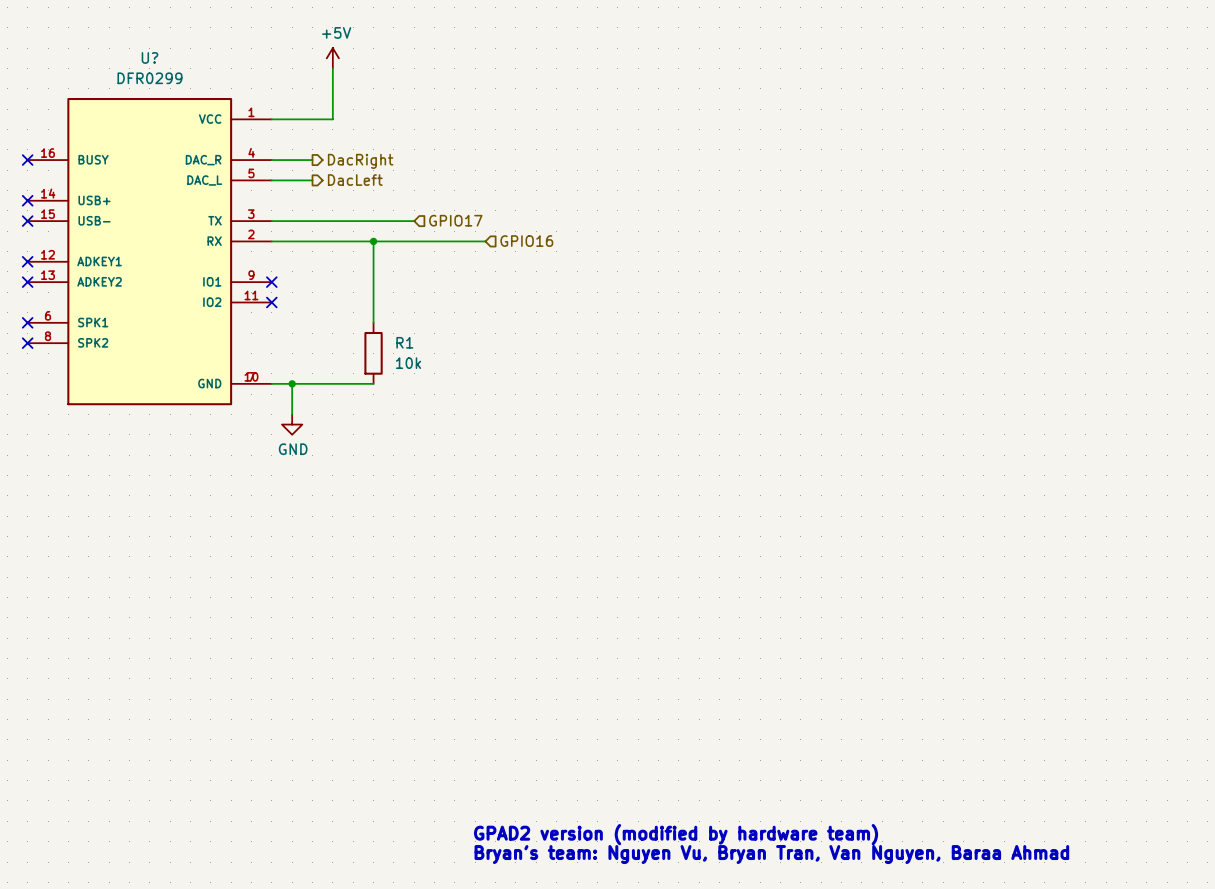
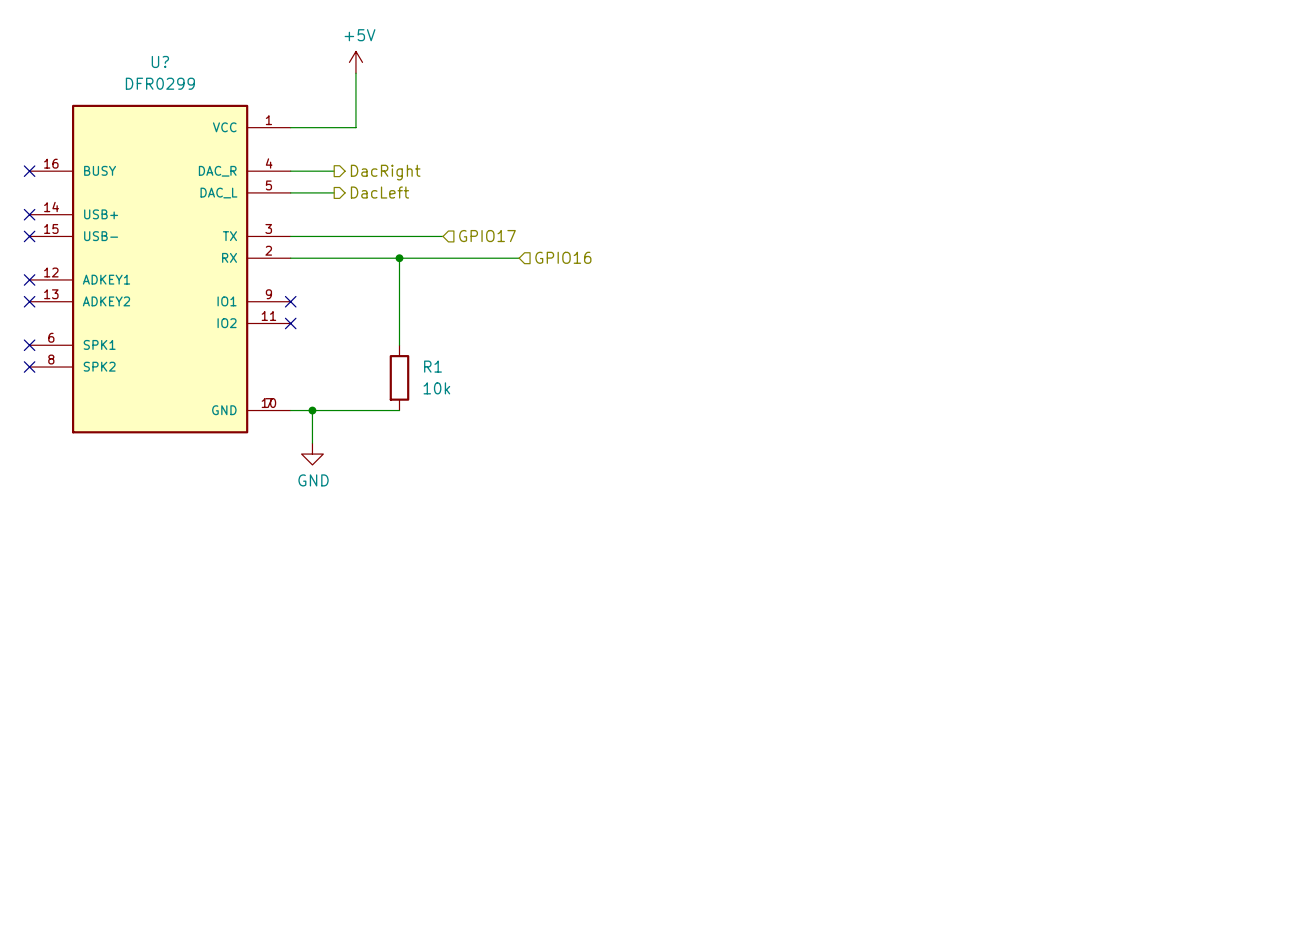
text: GPAD2 version (modified by hardware team) (676, 834) -> none
text: Bryan's team: Nguyen Vu, Bryan Tran, Van Nguyen, Baraa Ahmad (771, 854) -> none

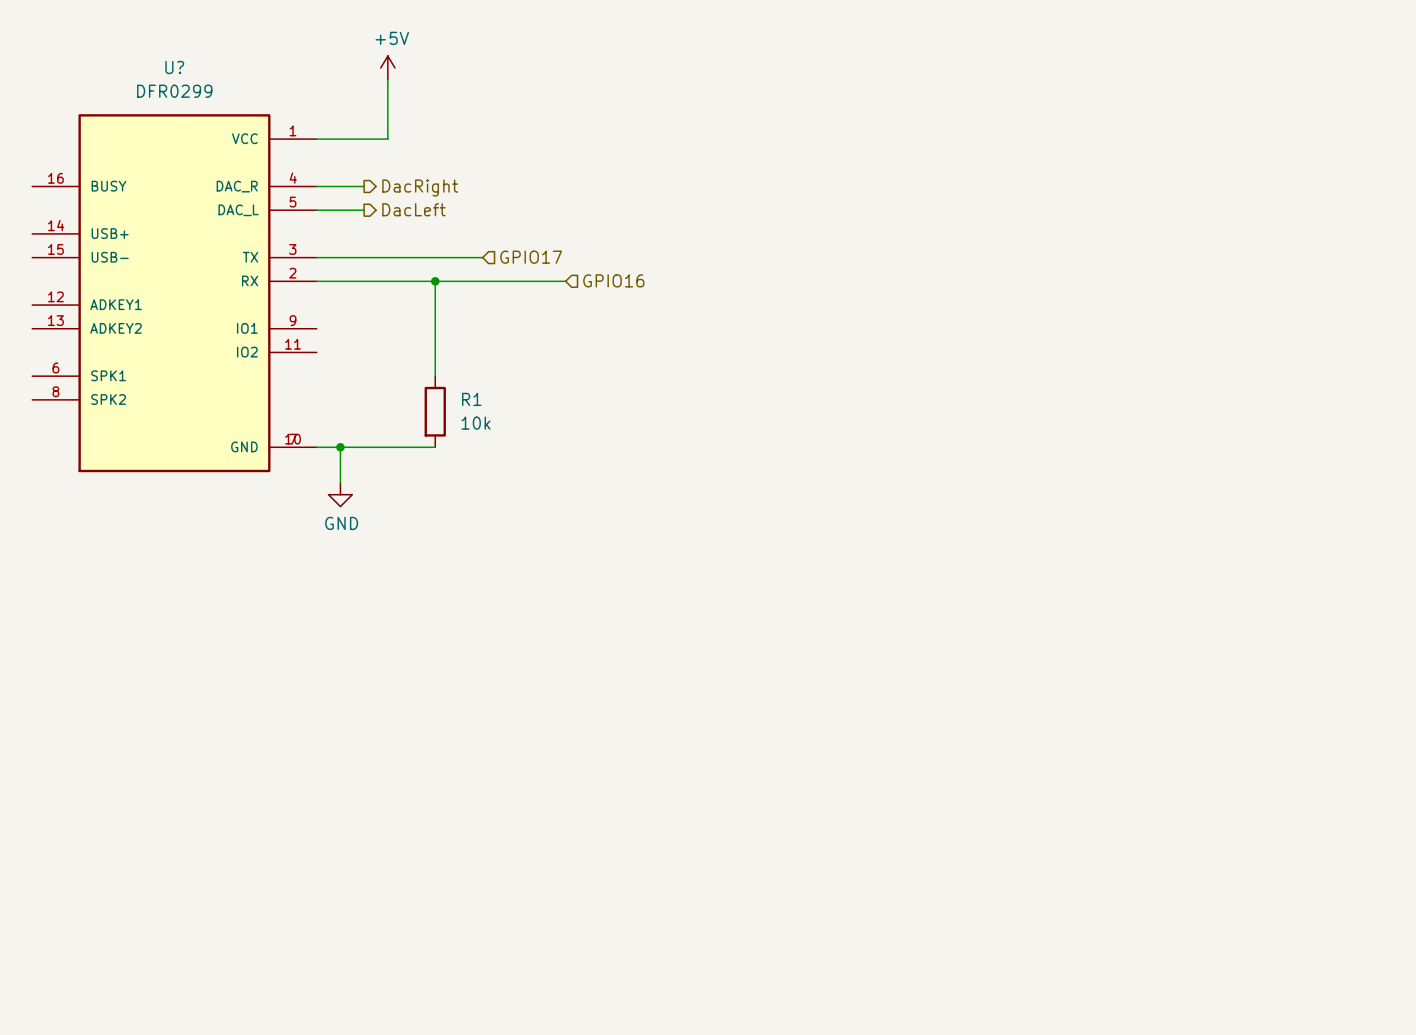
no-connect mark: (29, 171) -> none
no-connect mark: (29, 214) -> none
no-connect mark: (29, 236) -> none
no-connect mark: (29, 279) -> none
no-connect mark: (29, 301) -> none
no-connect mark: (290, 301) -> none
no-connect mark: (290, 323) -> none
no-connect mark: (29, 345) -> none
no-connect mark: (29, 367) -> none

